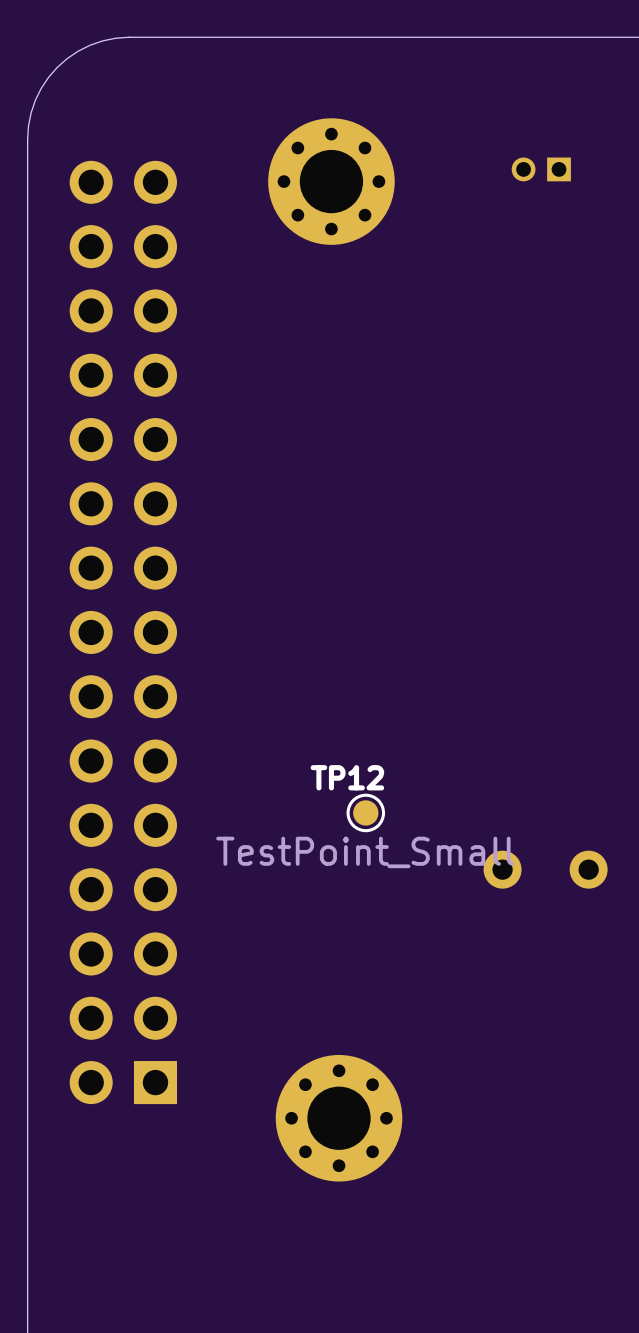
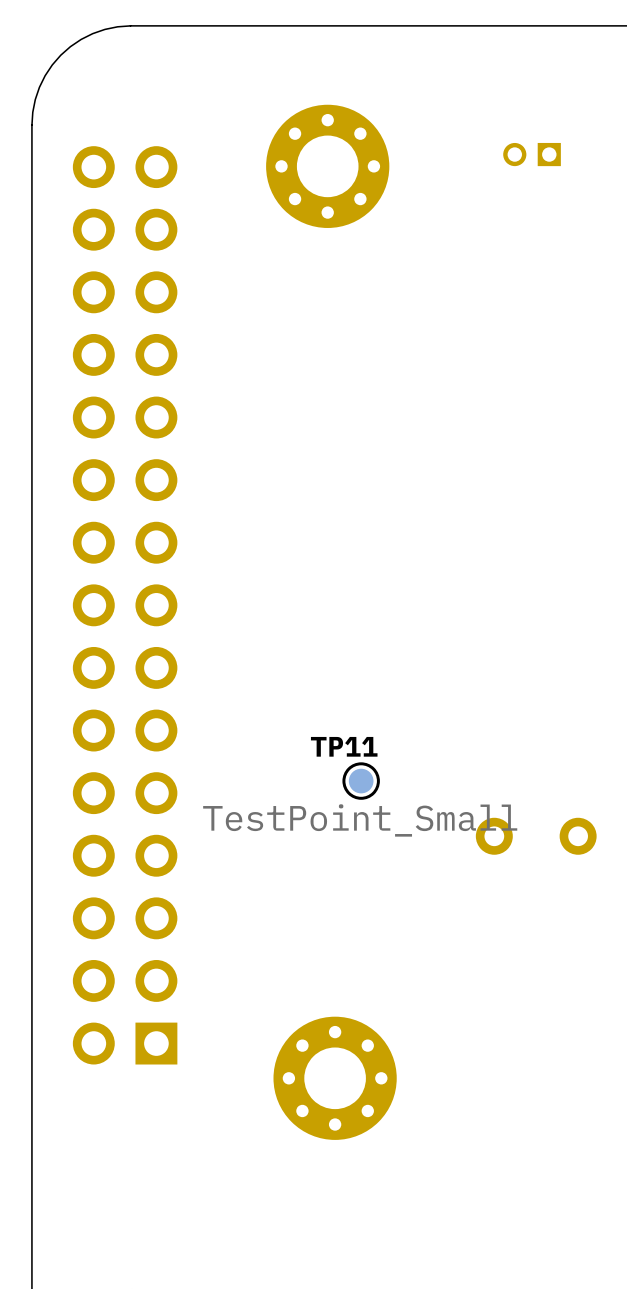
TP12 name: TP12 (347, 777) -> TP11 (344, 746)

